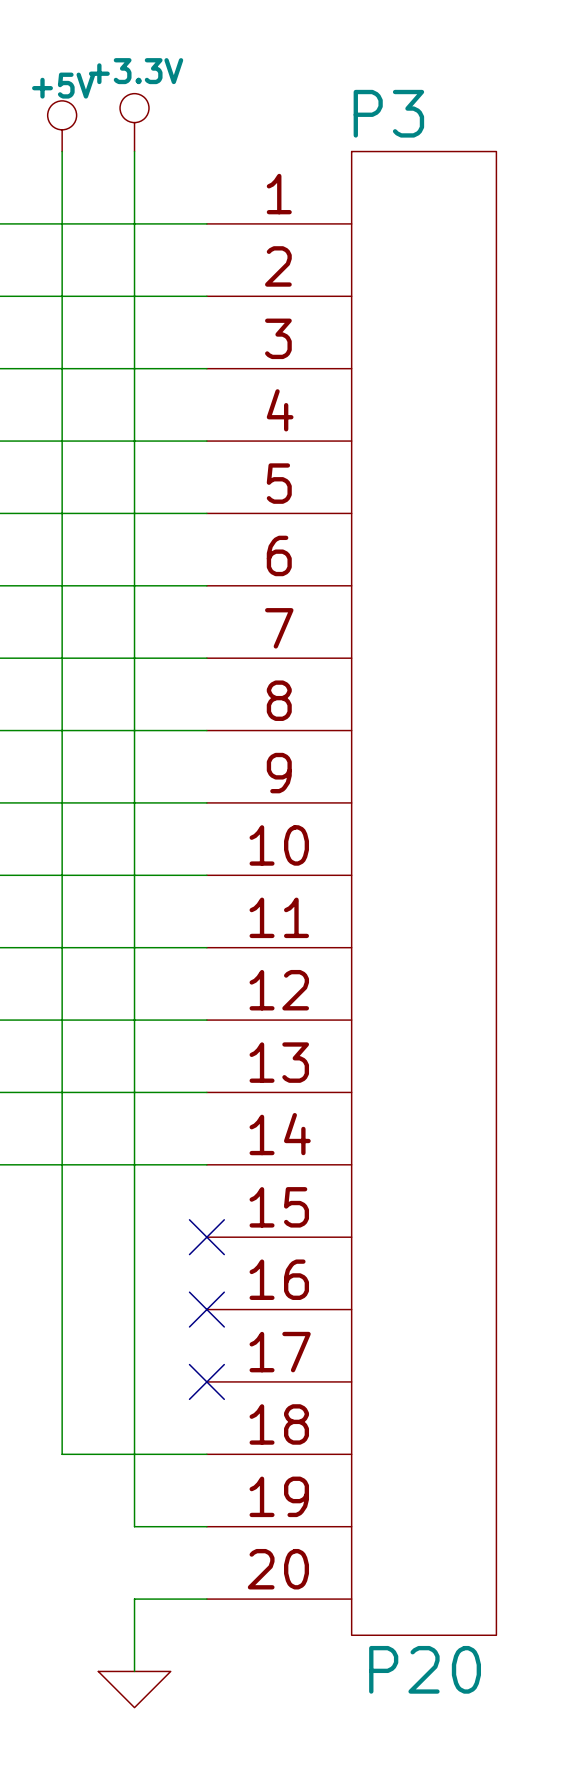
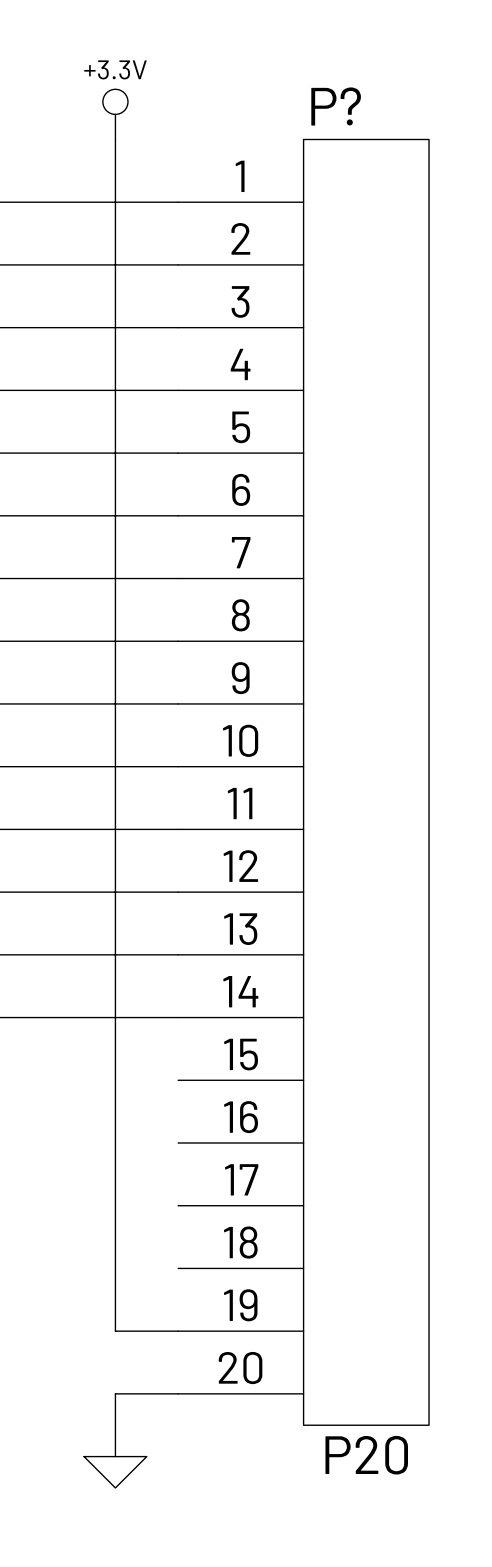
P3 name: P3 (388, 113) -> P? (336, 106)
power symbol: +5V (62, 126) -> none
wire: (62, 151) (62, 1454) (206, 1454) -> none
no-connect mark: (206, 1237) -> none
no-connect mark: (206, 1309) -> none
no-connect mark: (206, 1381) -> none

